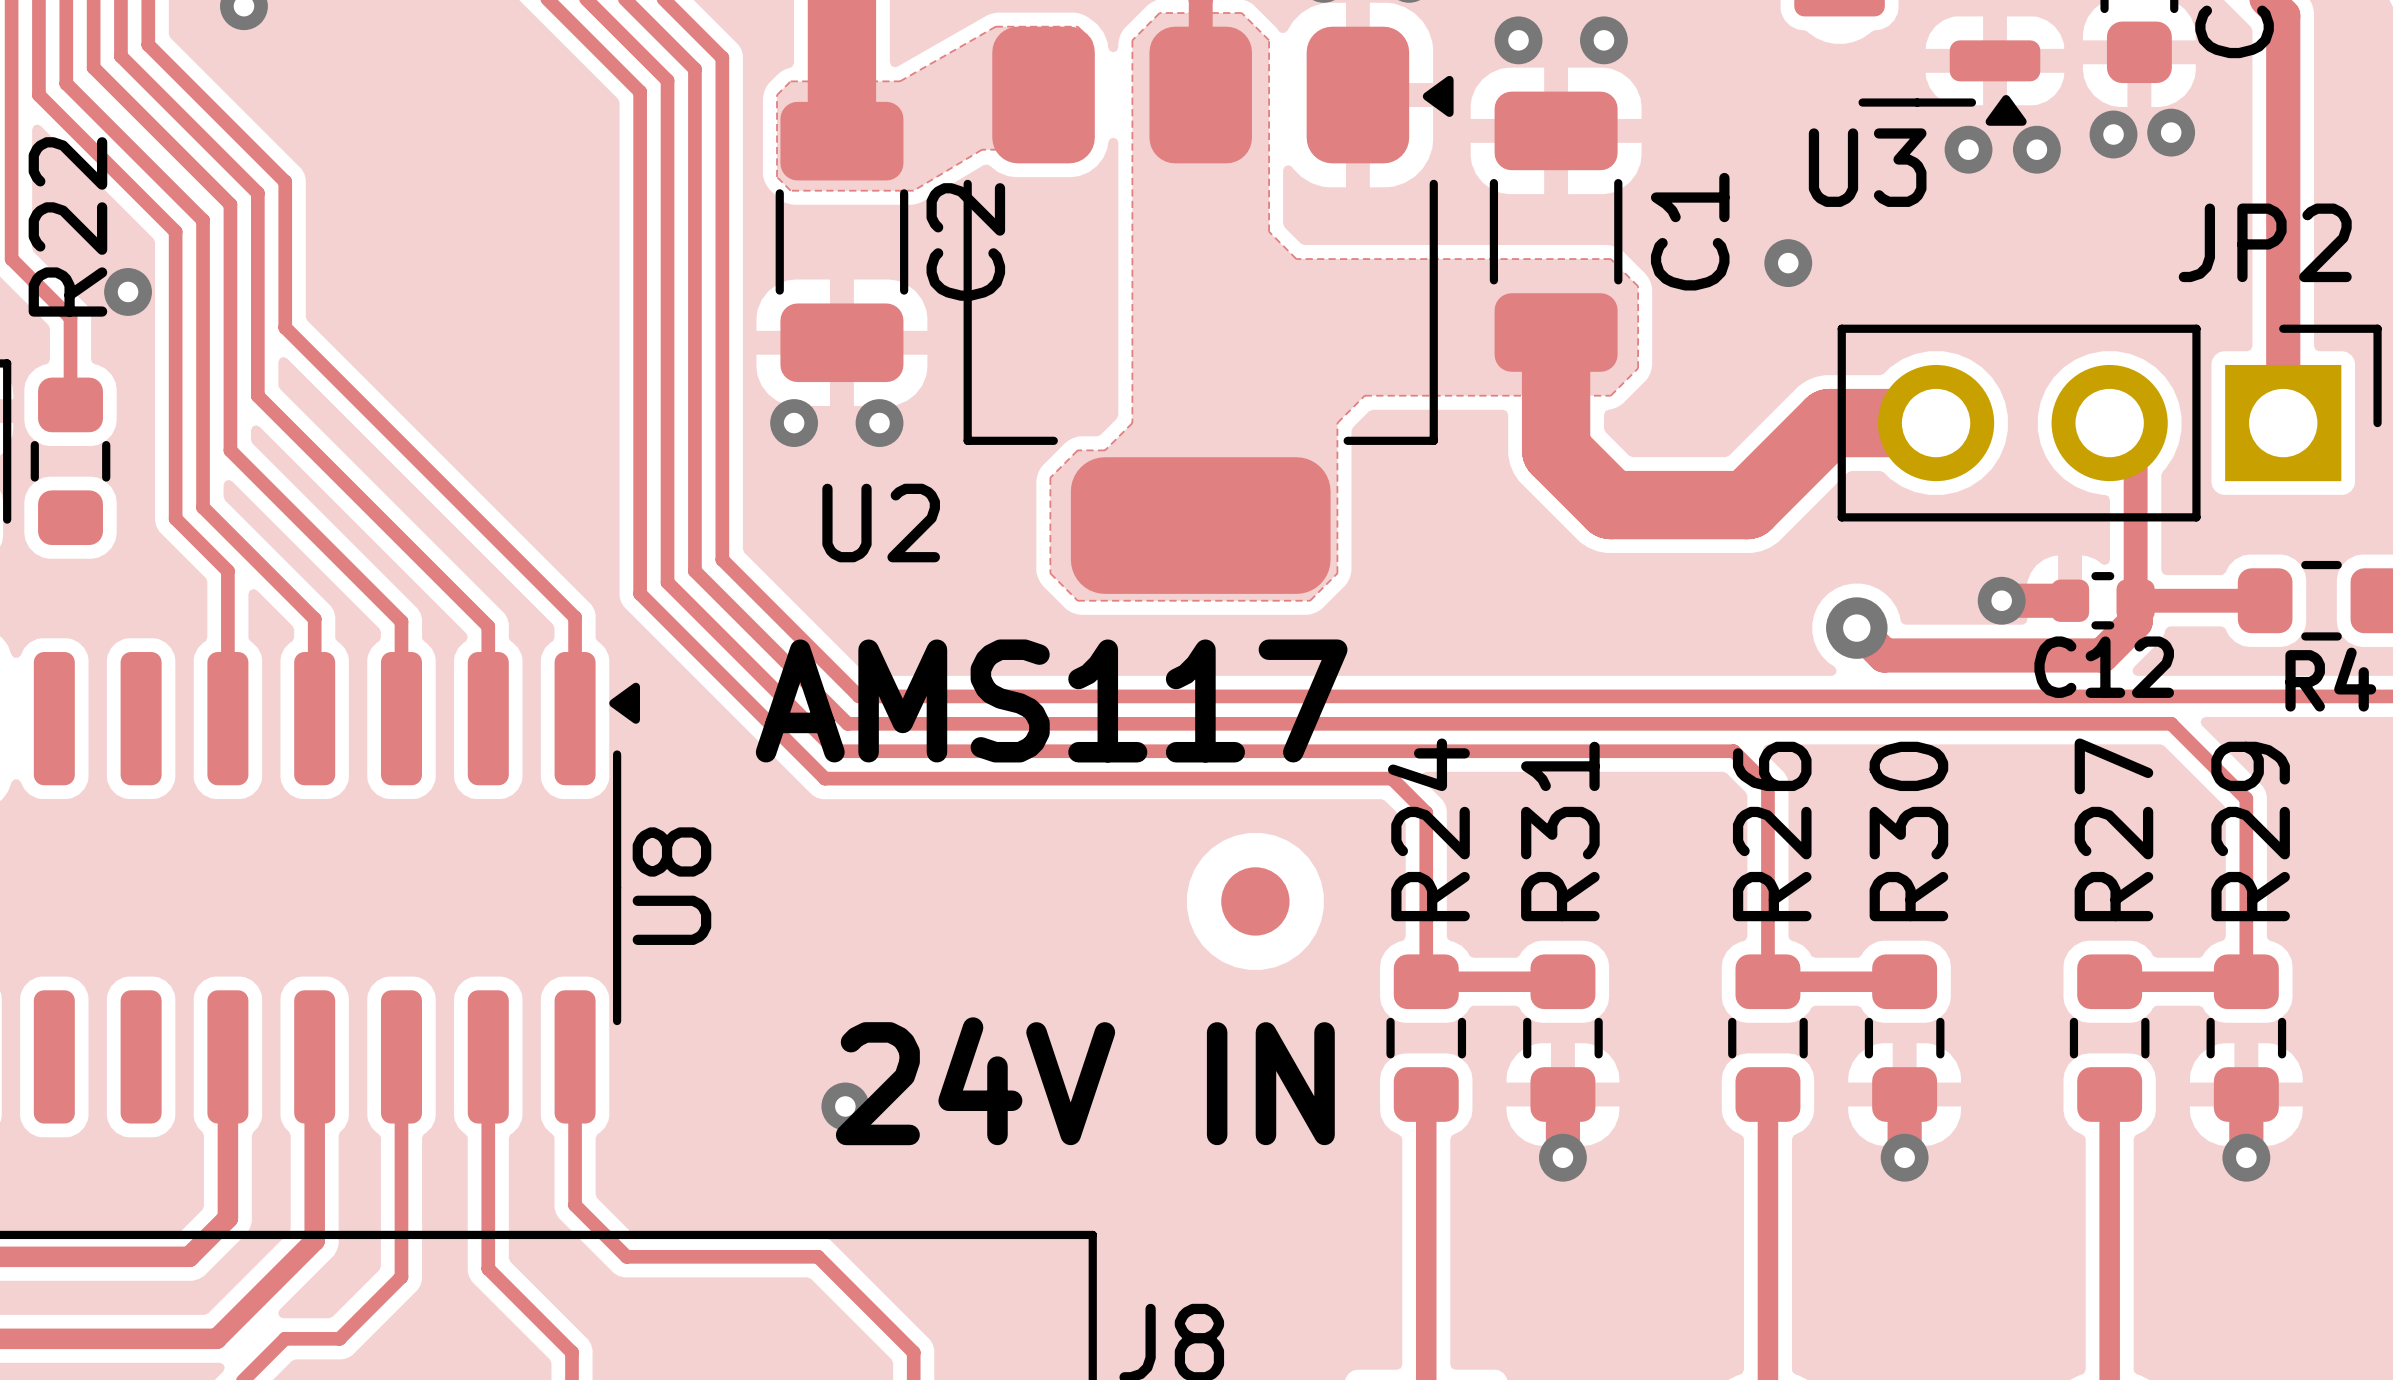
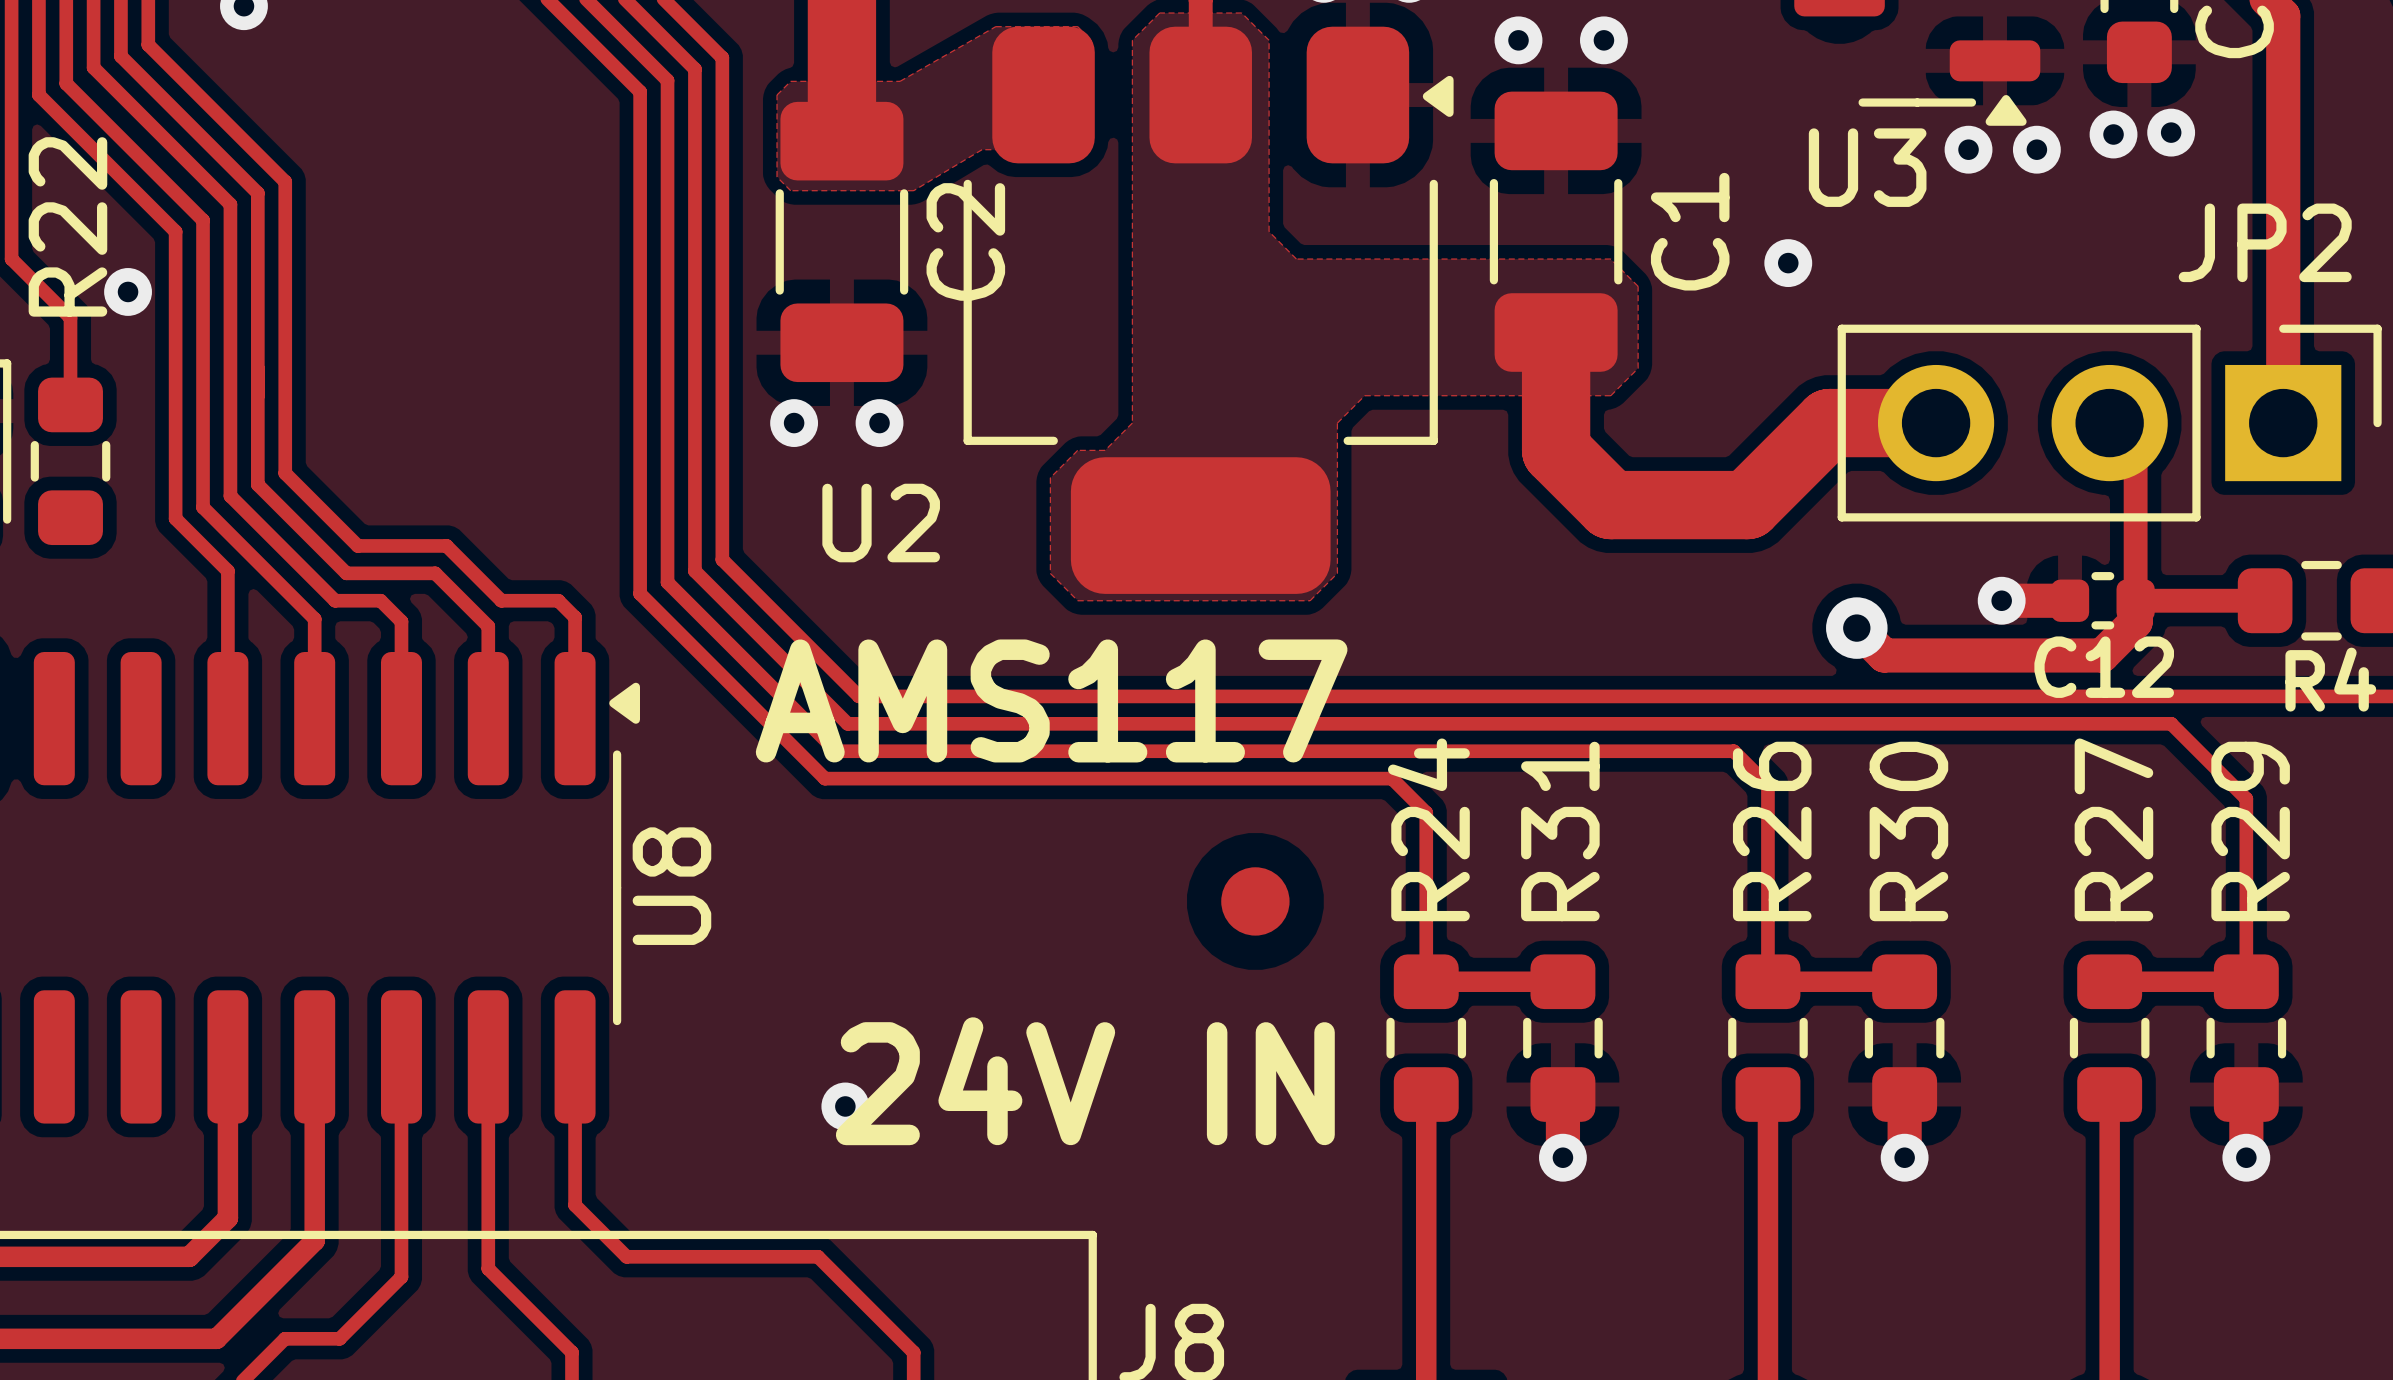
track: (285, 327) (558, 600) -> (285, 327) (285, 473) (357, 545) (446, 545) (501, 600) (558, 600)
track: (257, 395) (435, 573) -> (257, 395) (257, 484) (346, 573) (435, 573)
track: (230, 450) (380, 600) -> (230, 450) (230, 496) (335, 600) (380, 600)

